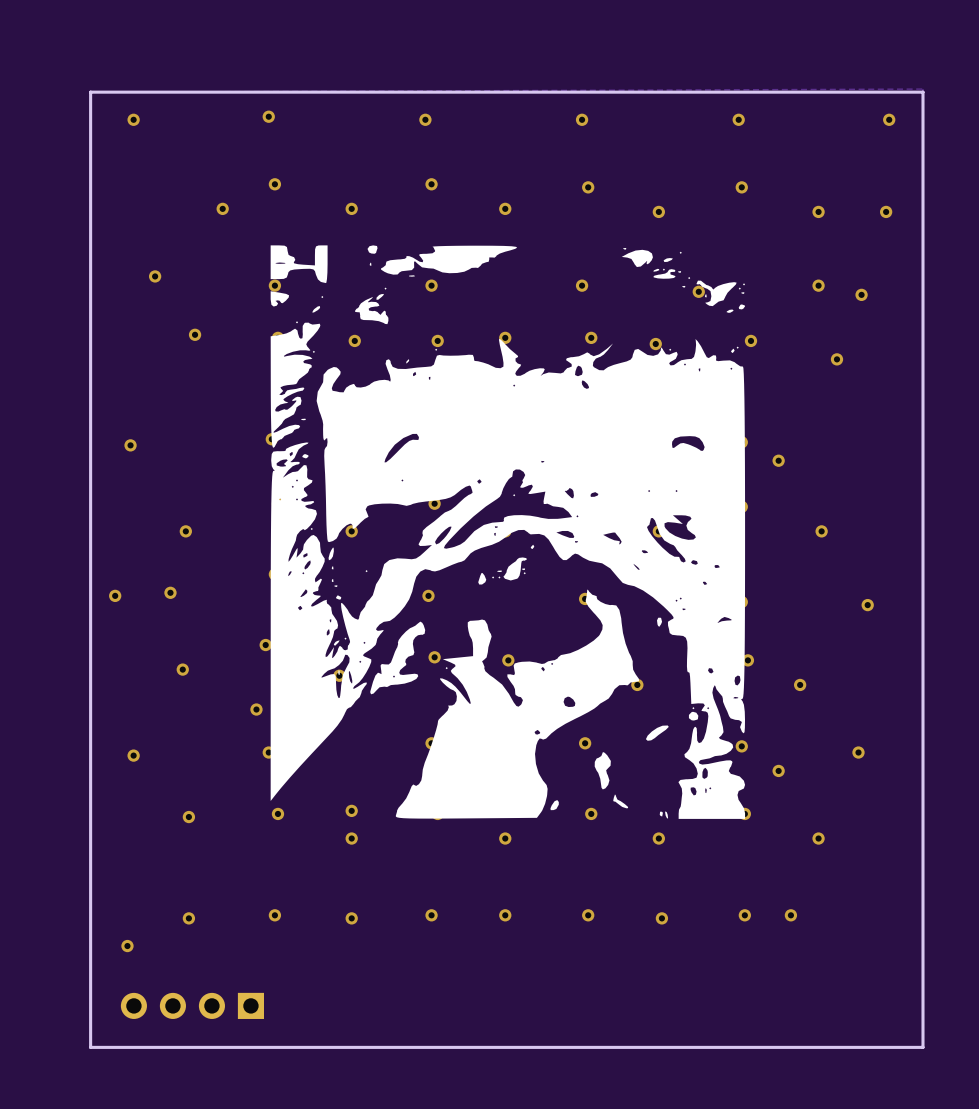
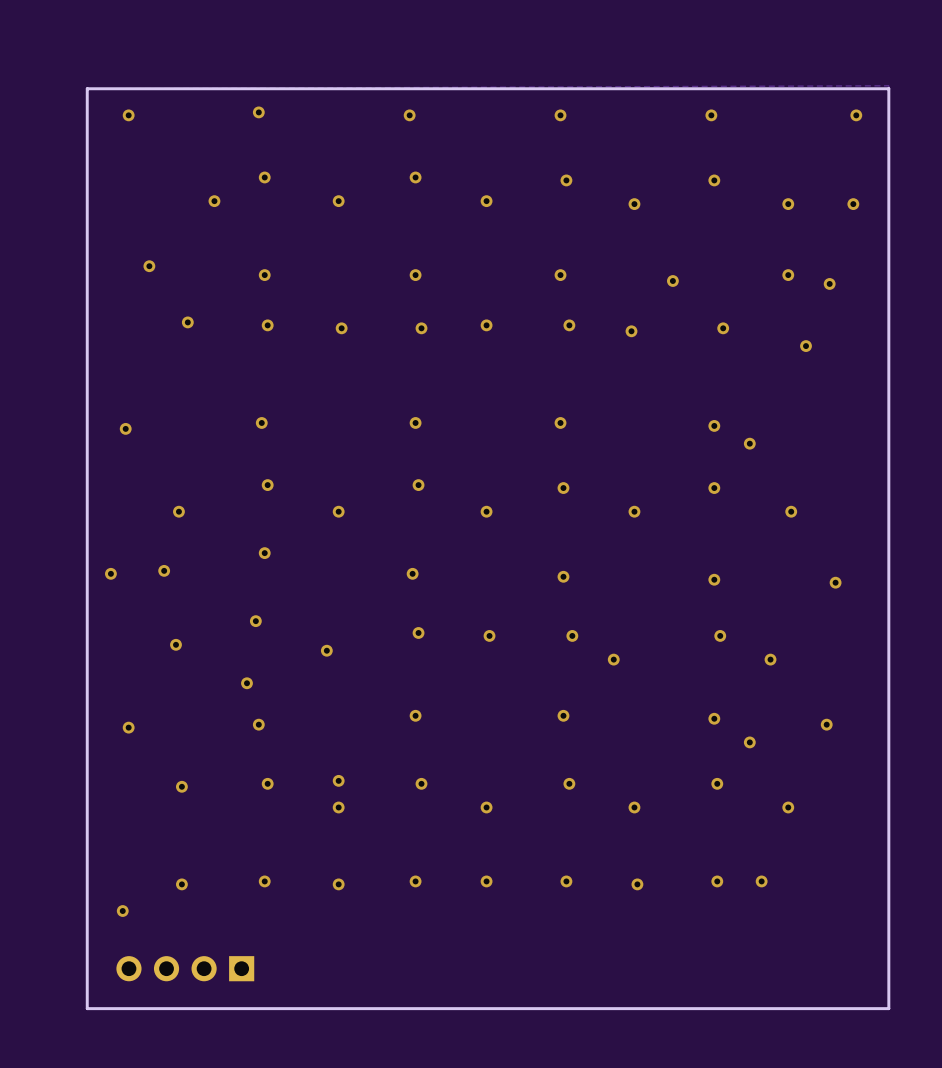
drawing: [270, 245, 746, 819] -> none

